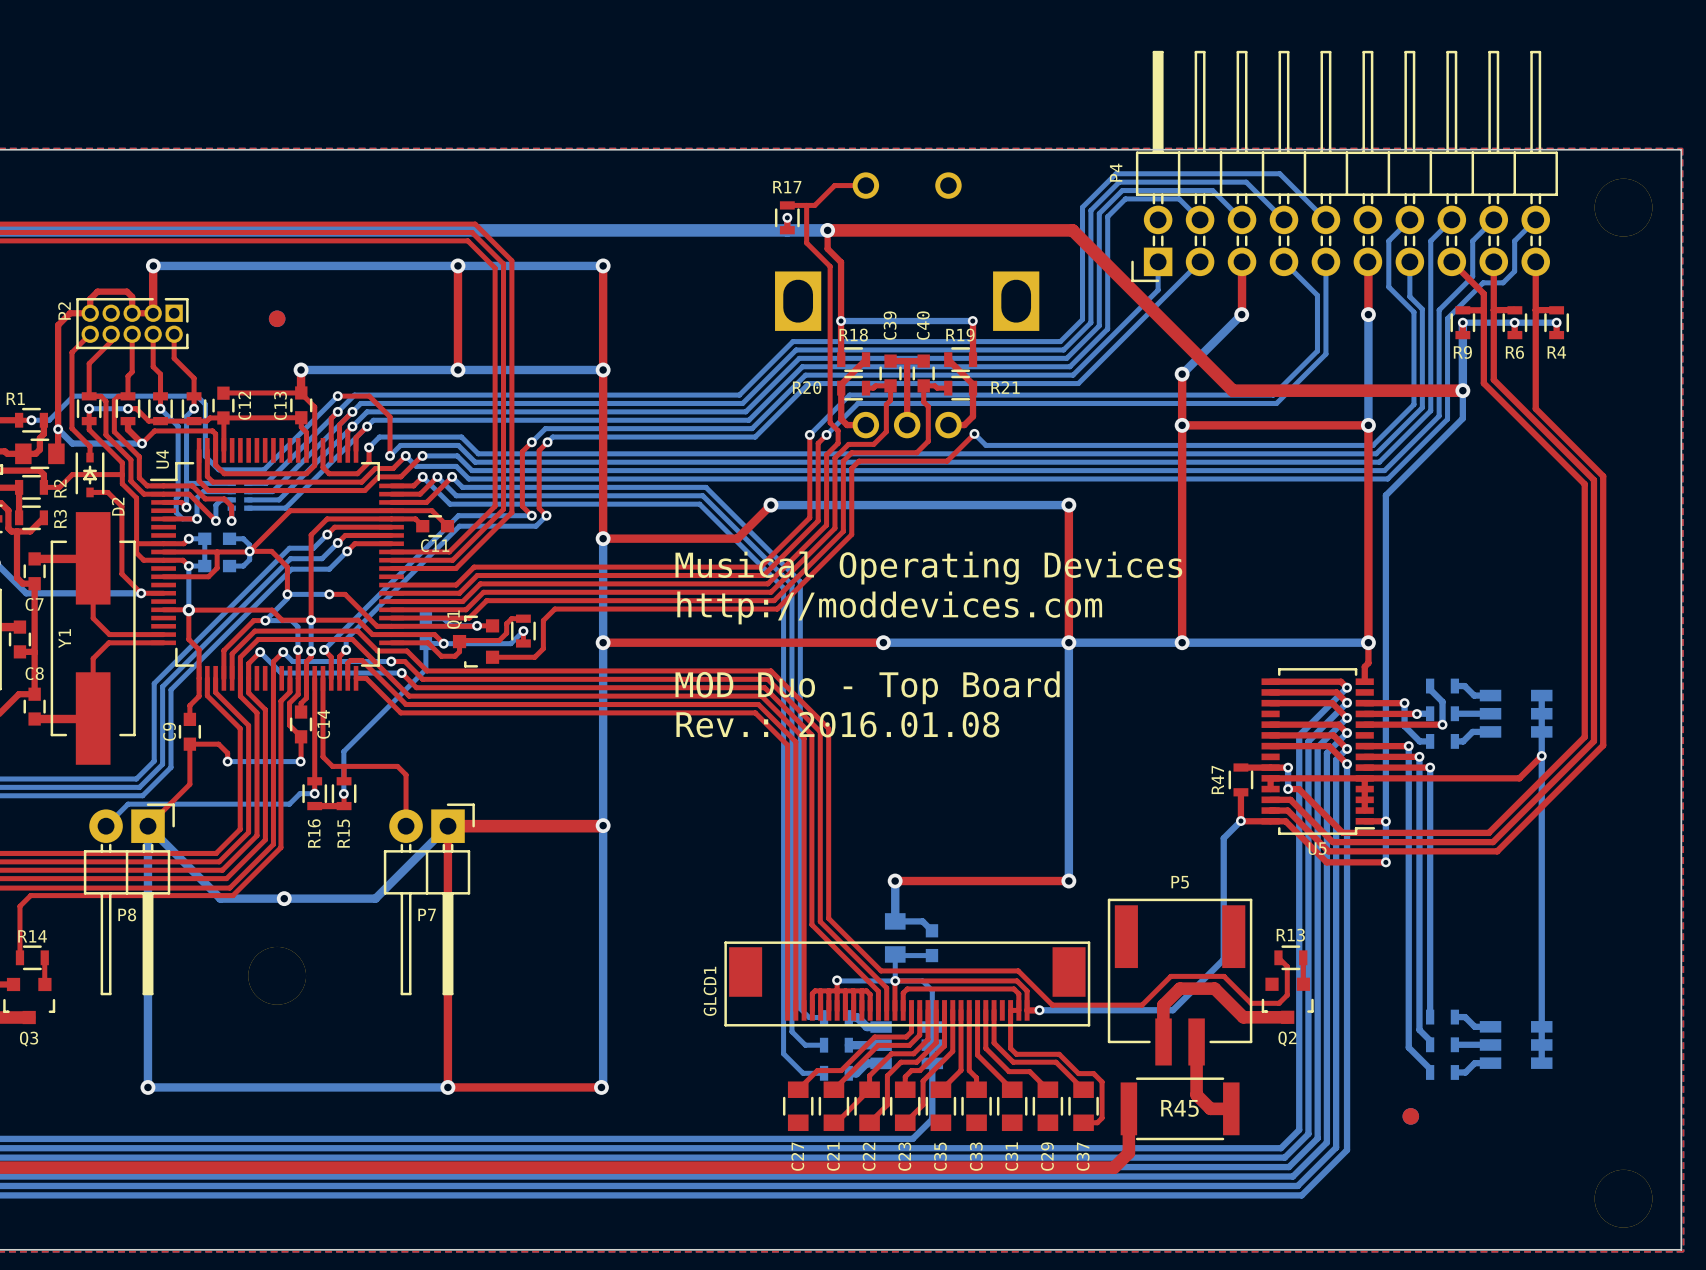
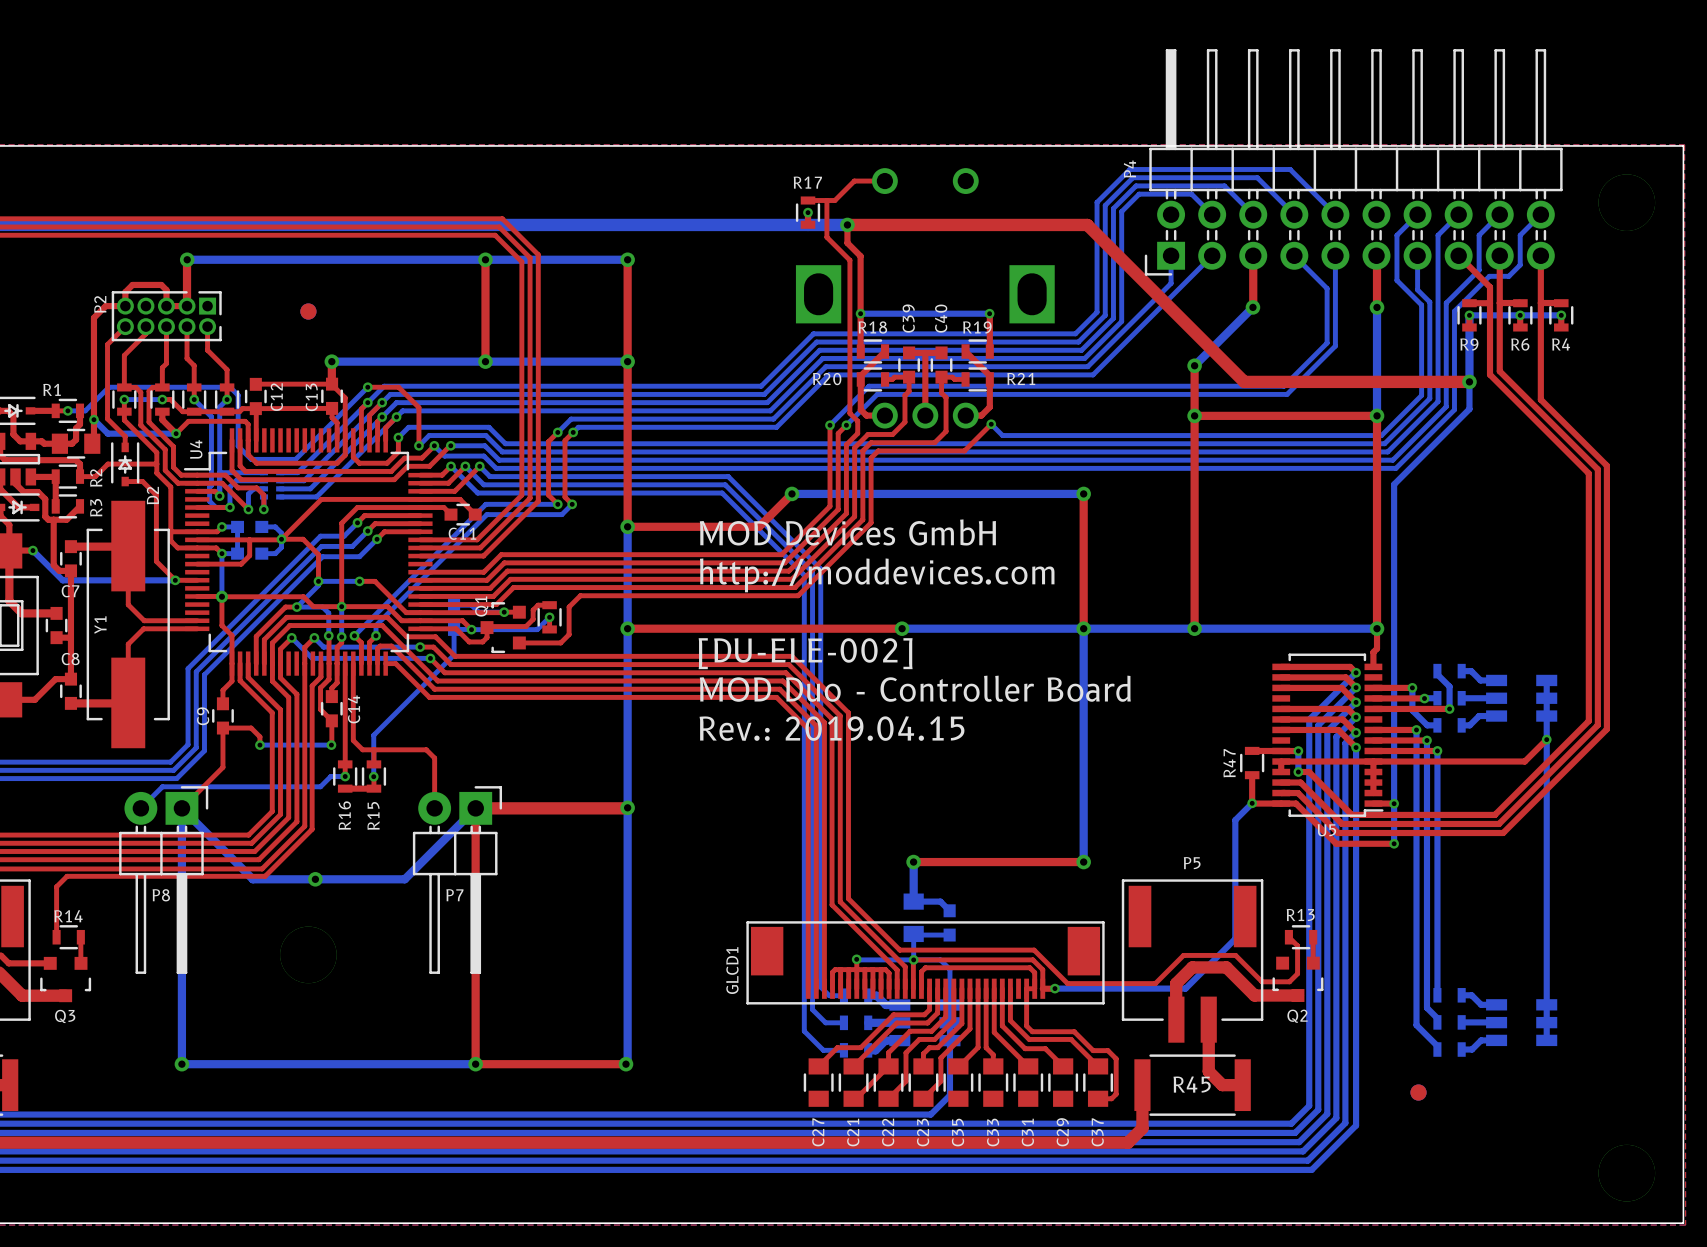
text: none -> MOD Devices GmbH (847, 532)
text: Musical Operating Devices (928, 568) -> none
text position: http://moddevices.com (889, 607) -> http://moddevices.com (877, 575)
text: none -> [DU-ELE-002] (805, 653)
text: MOD Duo - Top Board (867, 687) -> MOD Duo - Controller Board (915, 688)
text: Rev.: 2016.01.08 (837, 724) -> Rev.: 2019.04.15 (832, 728)

